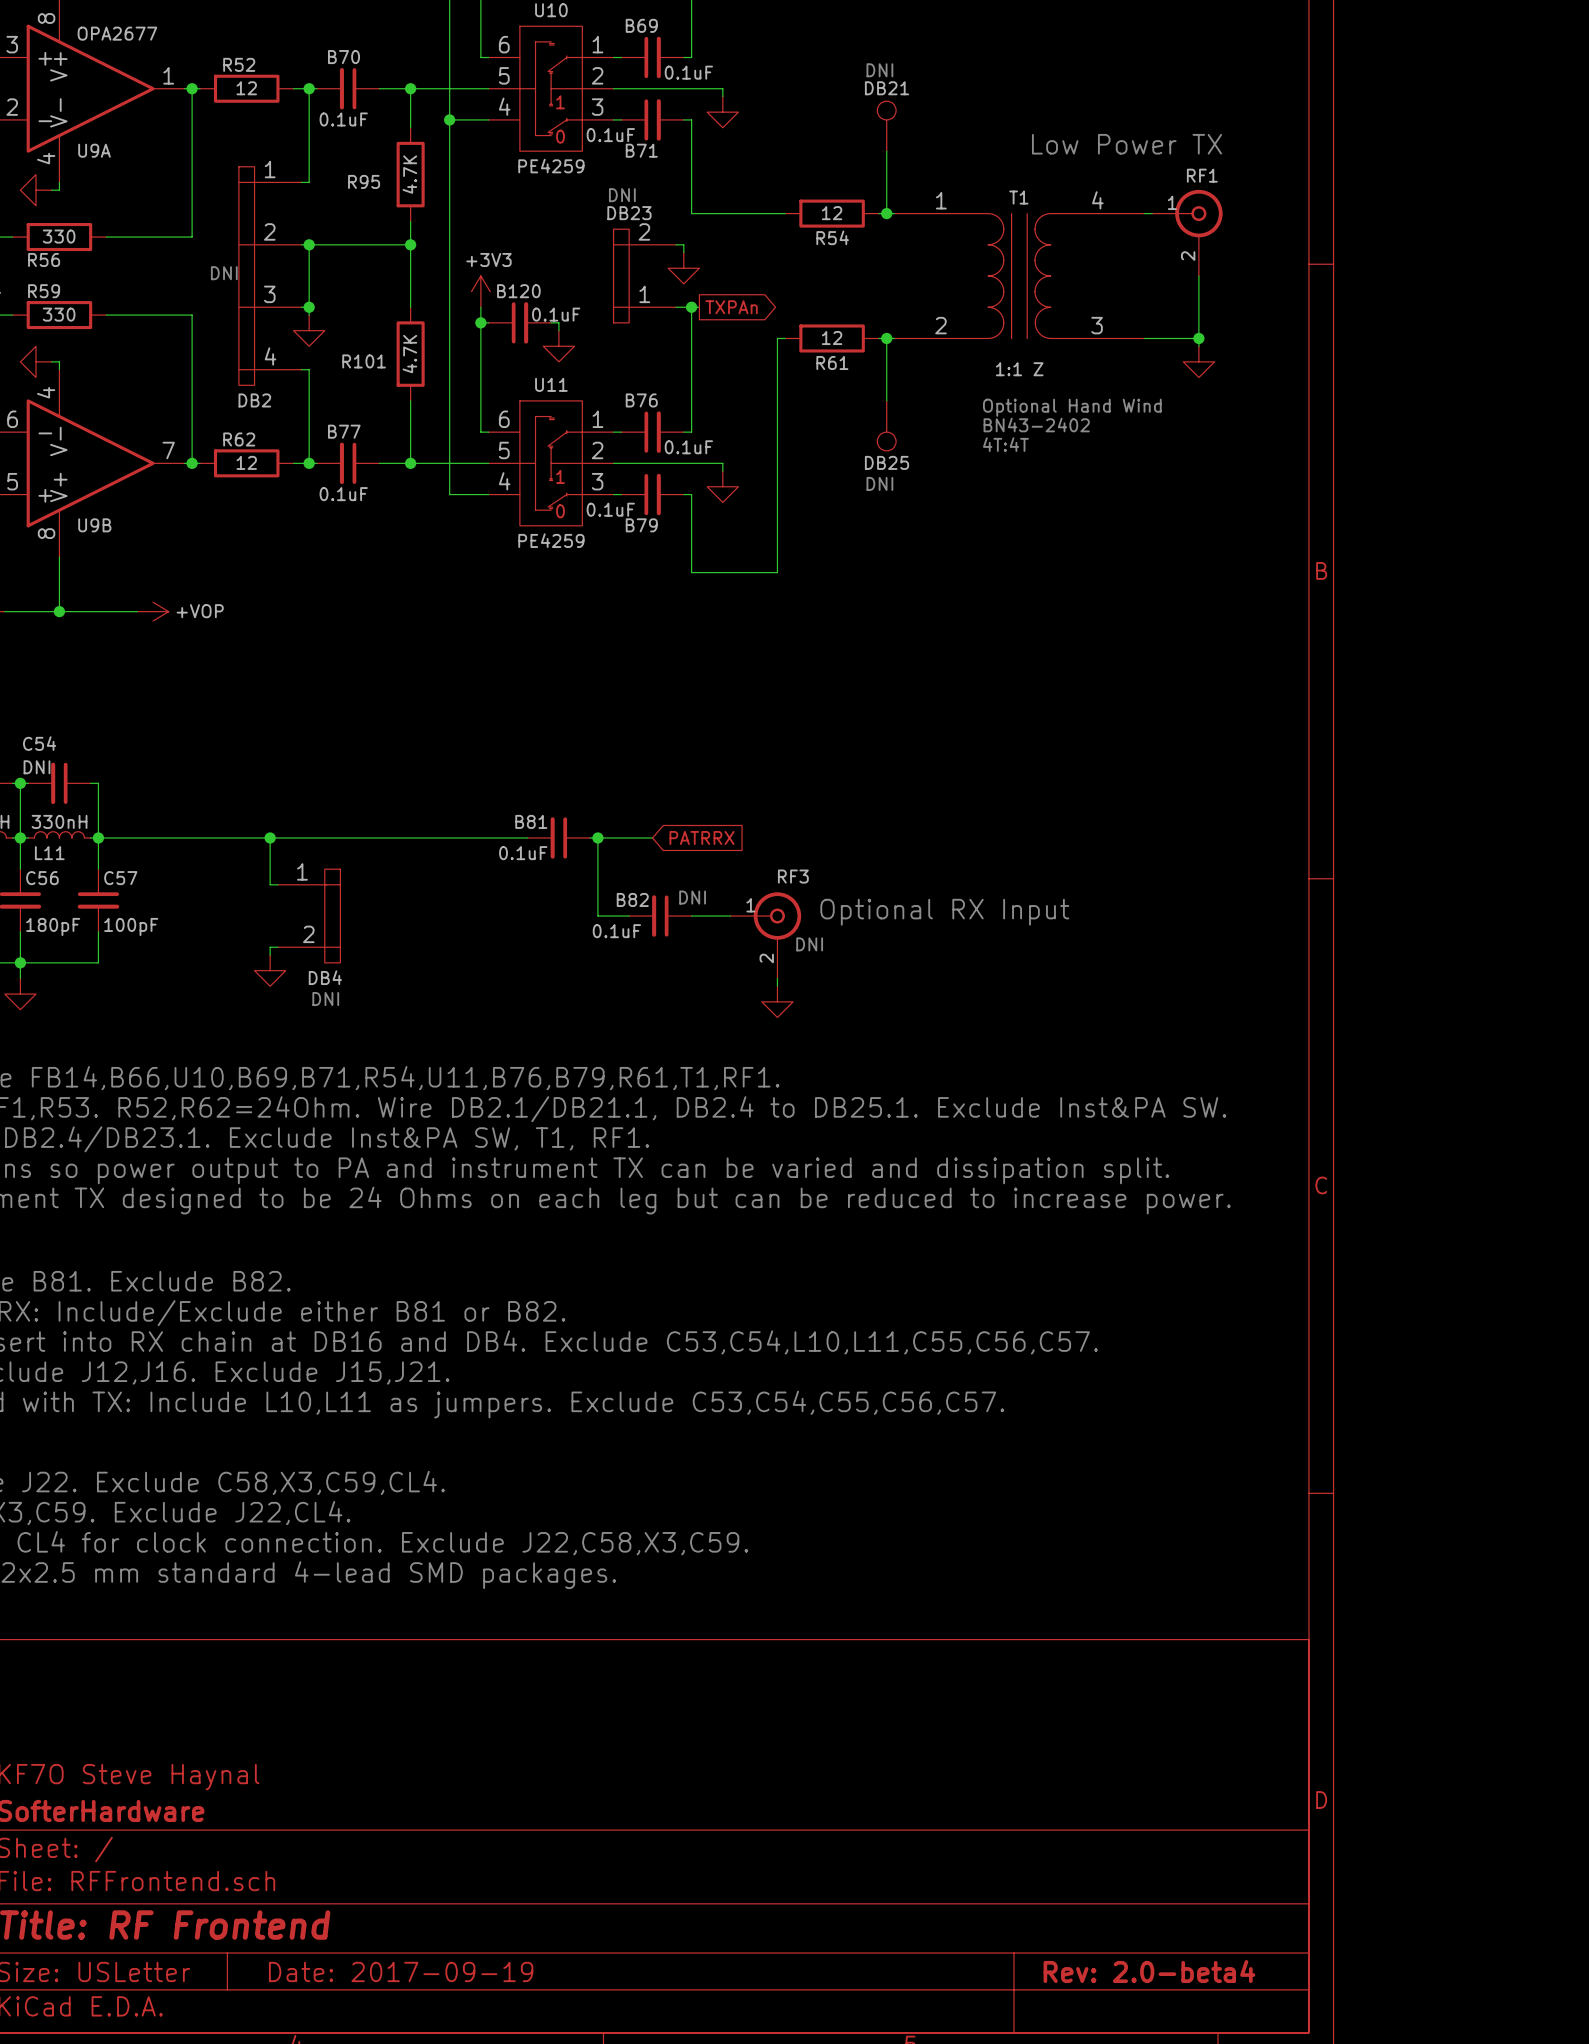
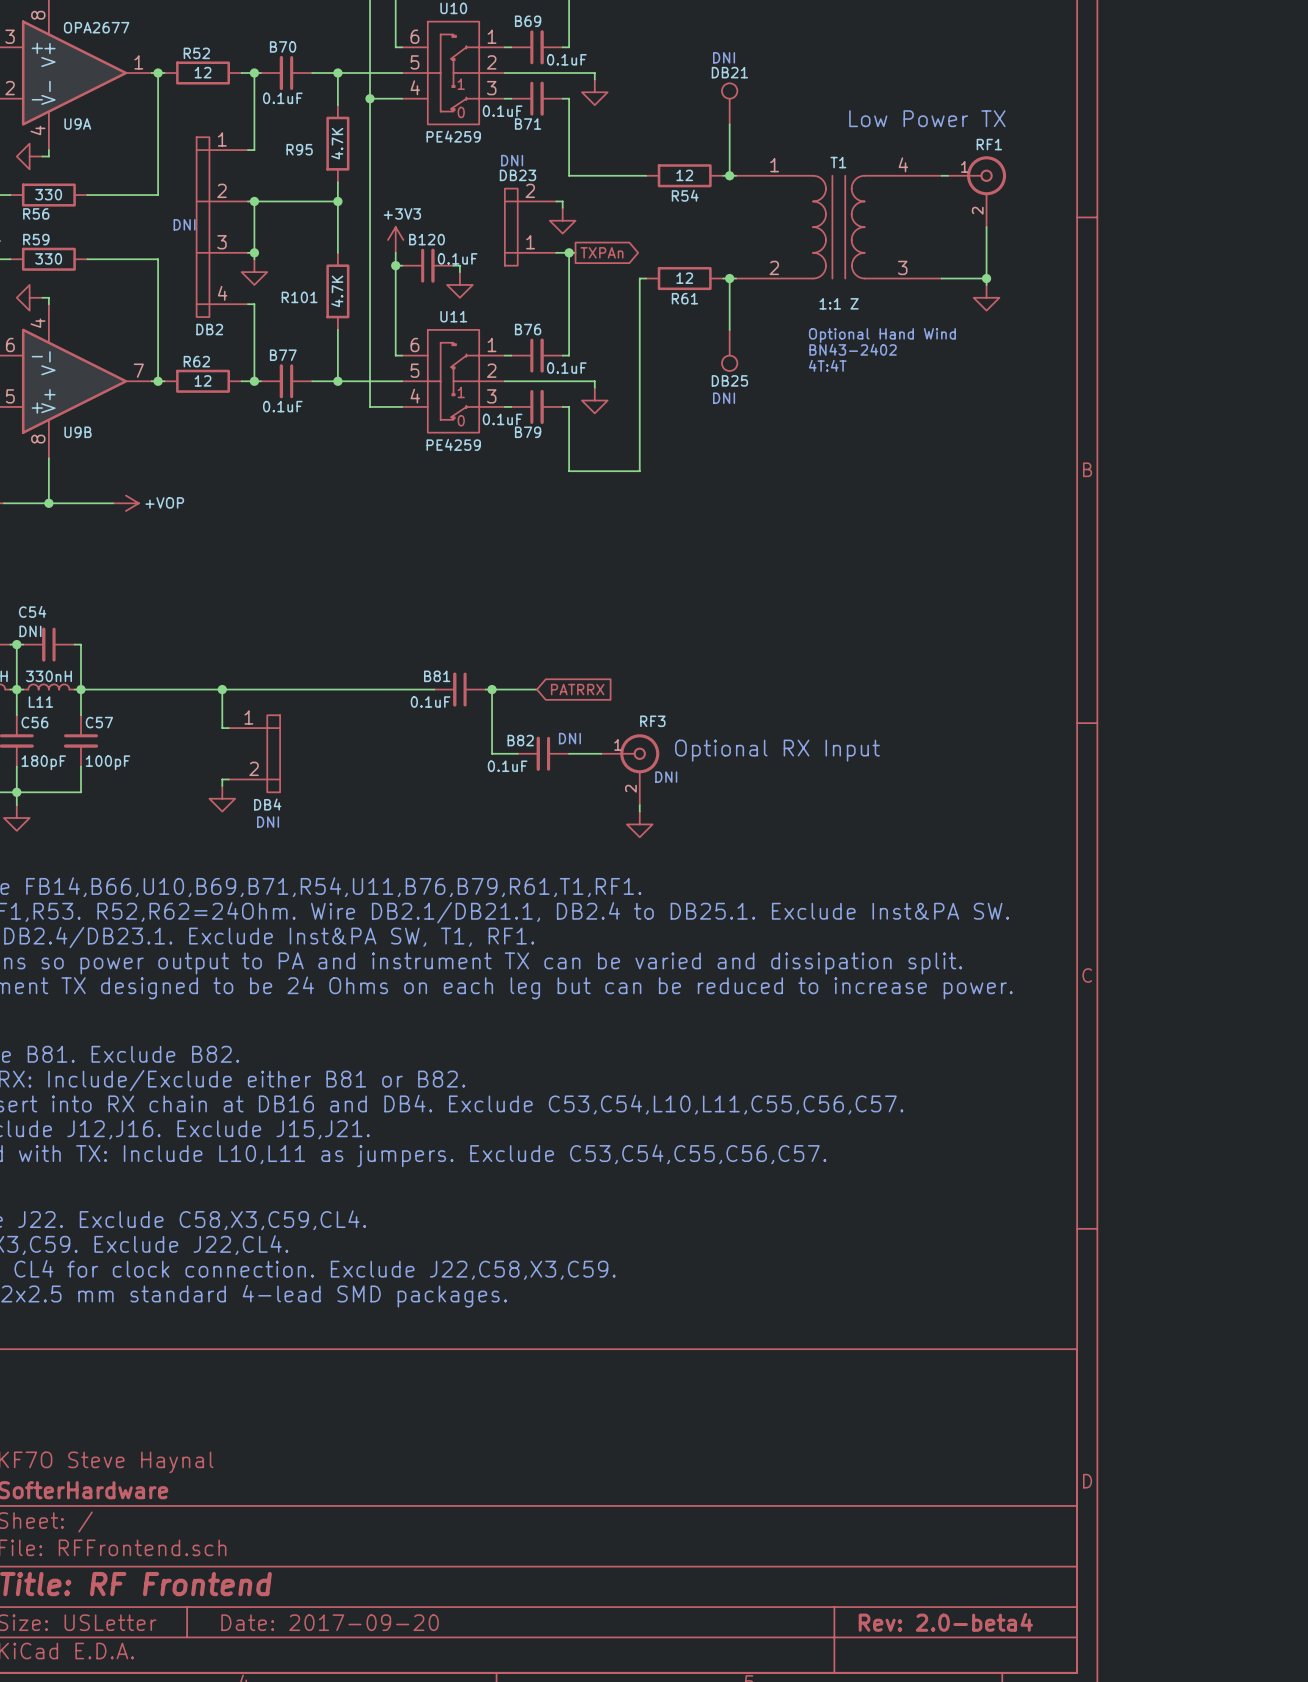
title block: Date: 2017-09-19 (401, 1971) -> Date: 2017-09-20 (330, 1622)

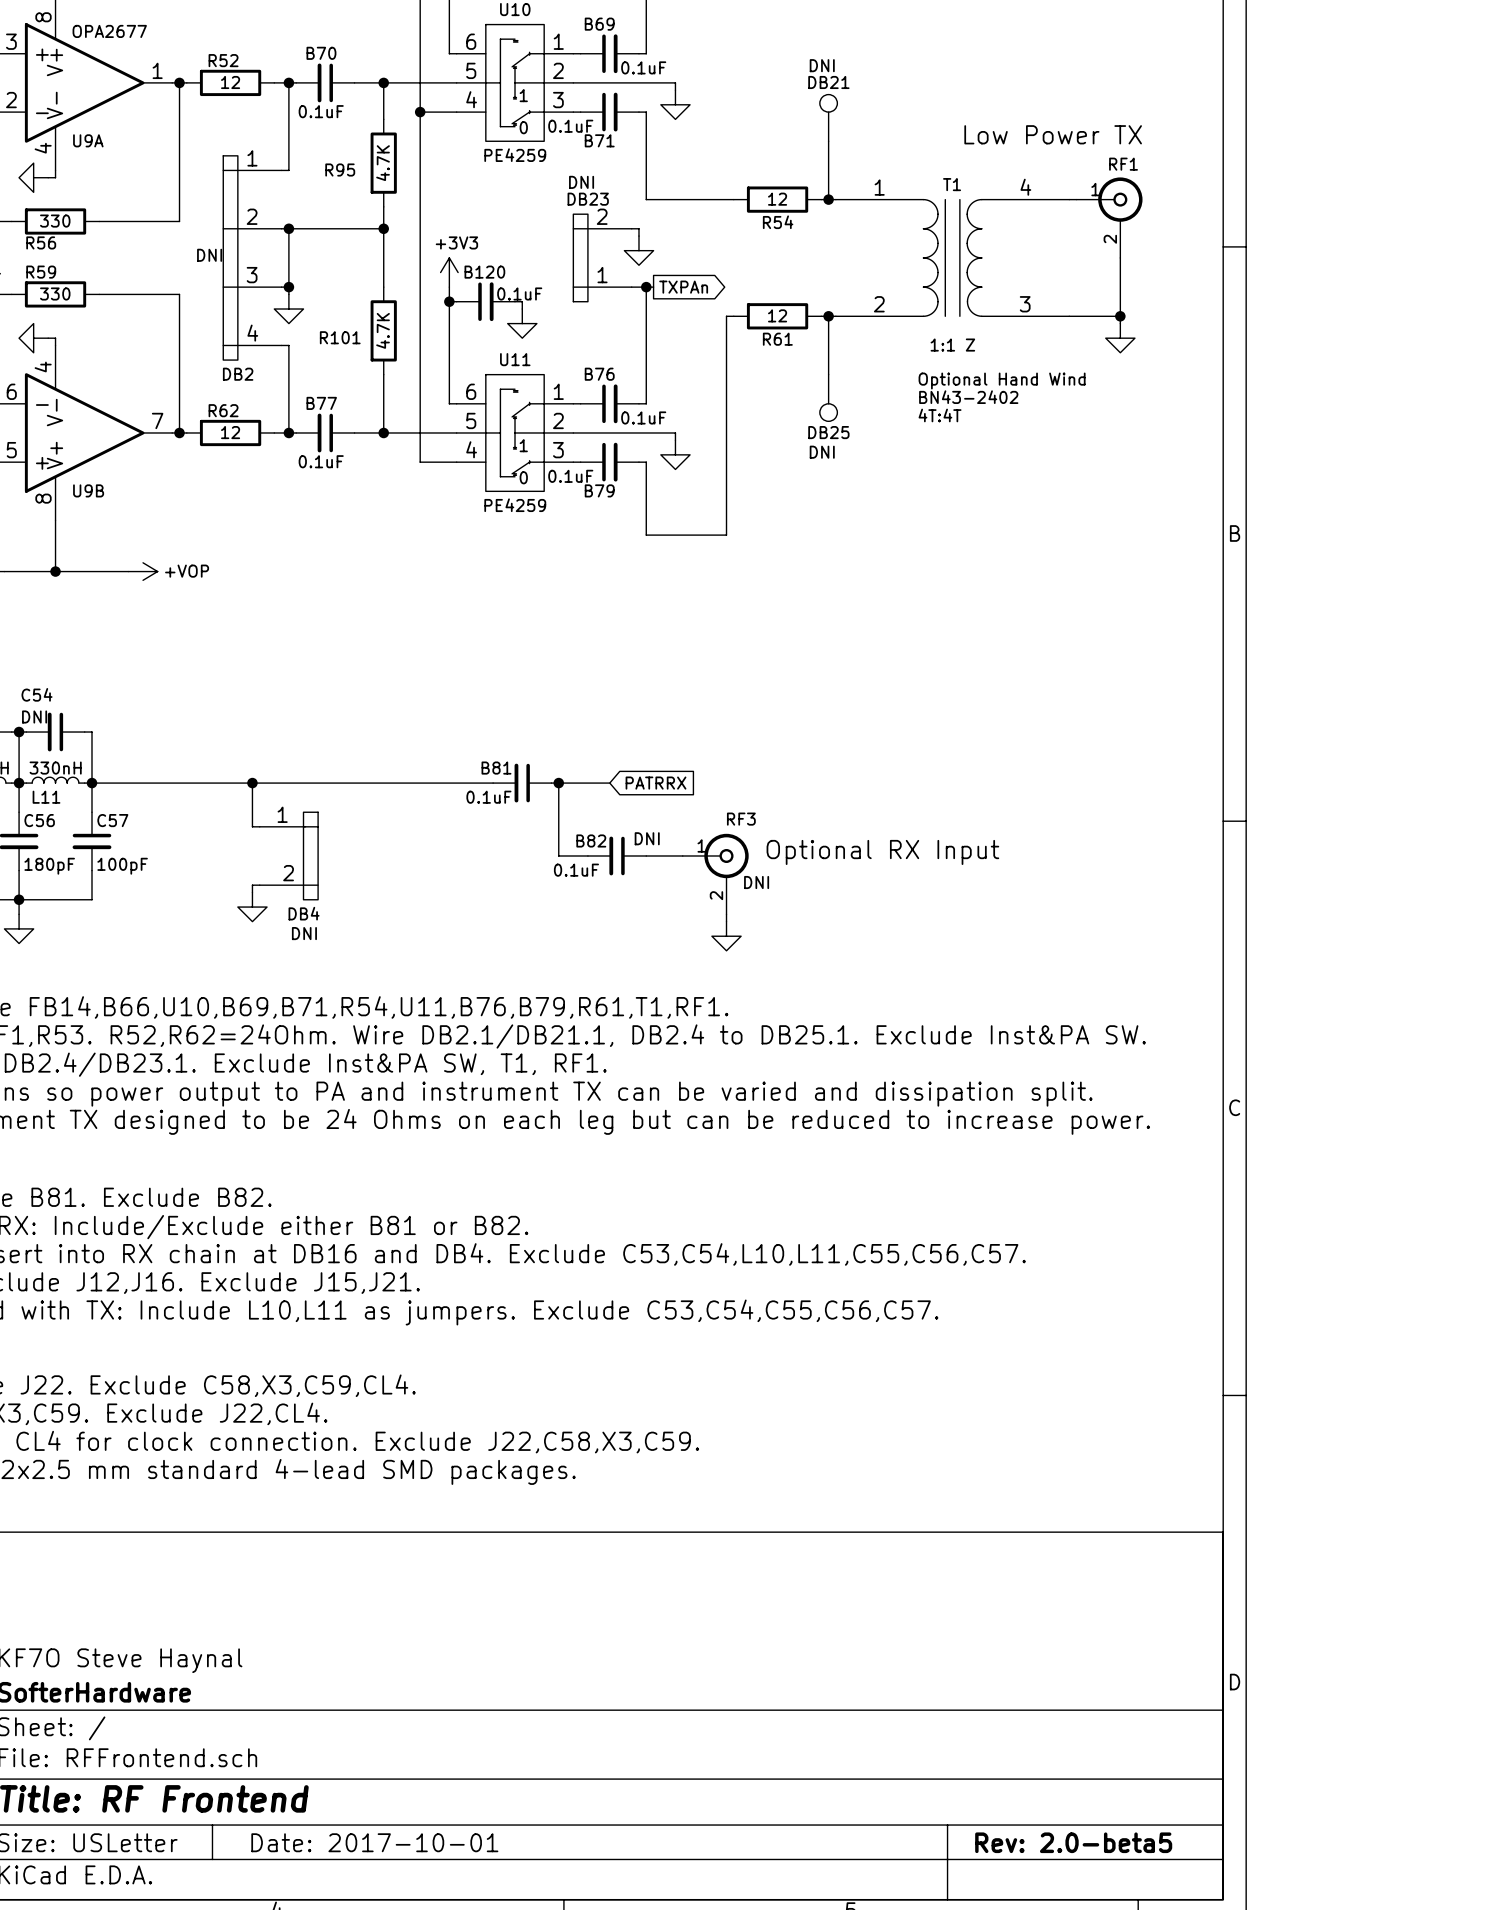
title block: Date: 2017-09-20 (330, 1622) -> Date: 2017-10-01 (374, 1842)
title block: Rev: 2.0-beta4 (945, 1622) -> Rev: 2.0-beta5 (1073, 1842)

